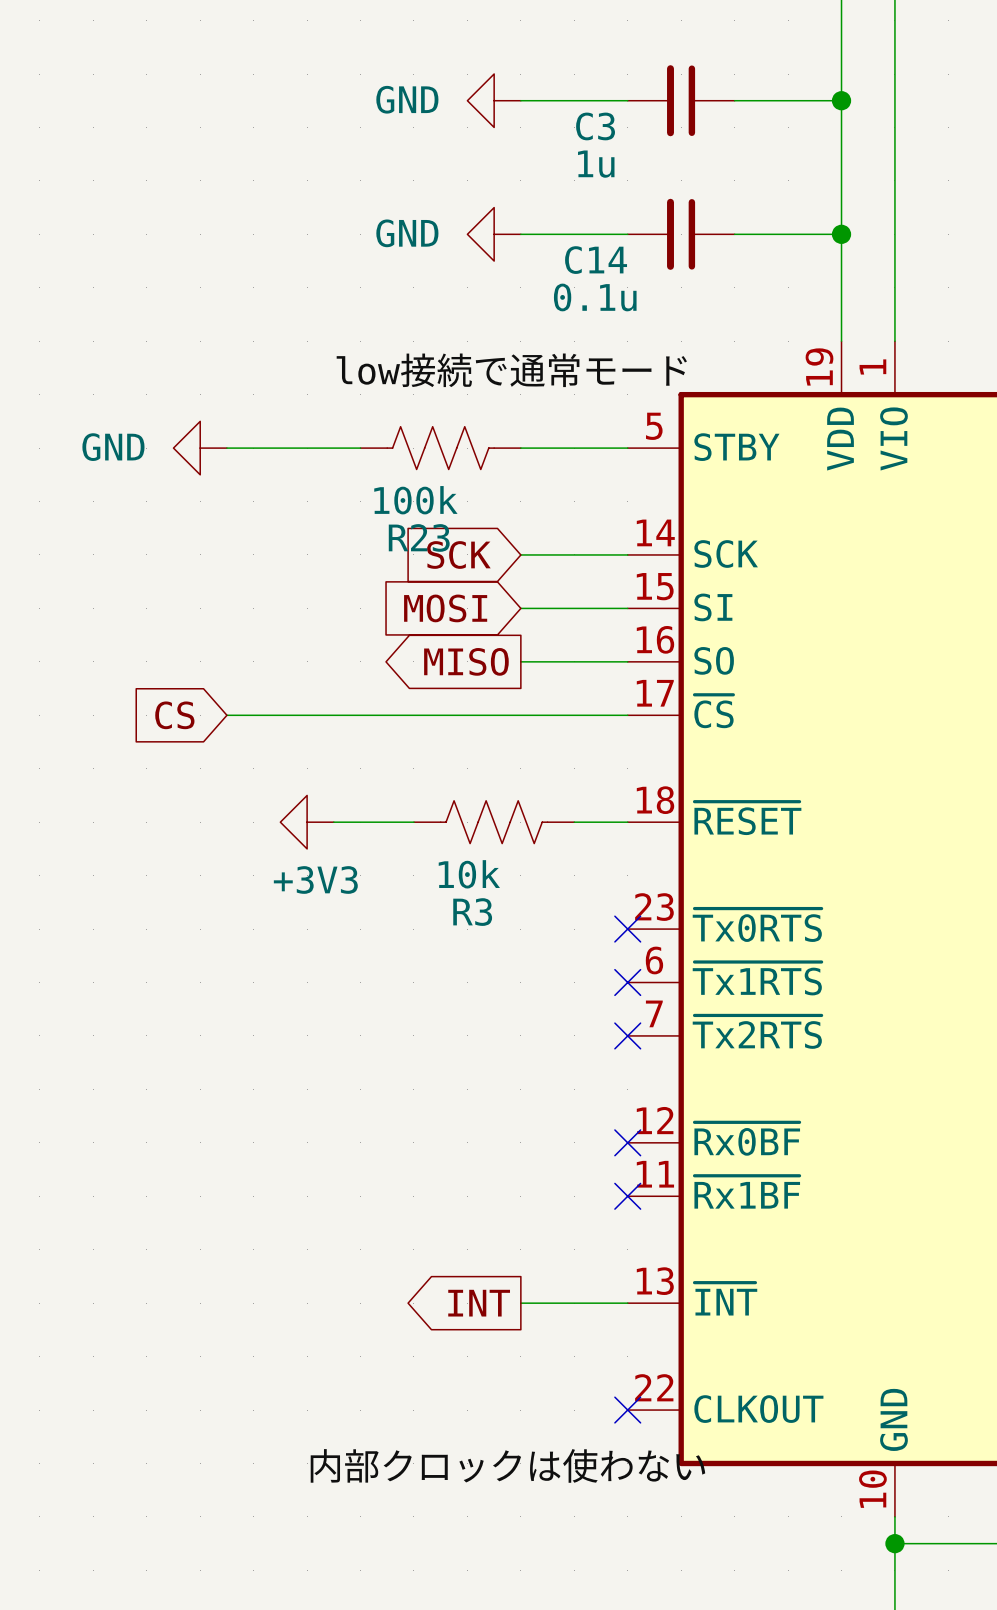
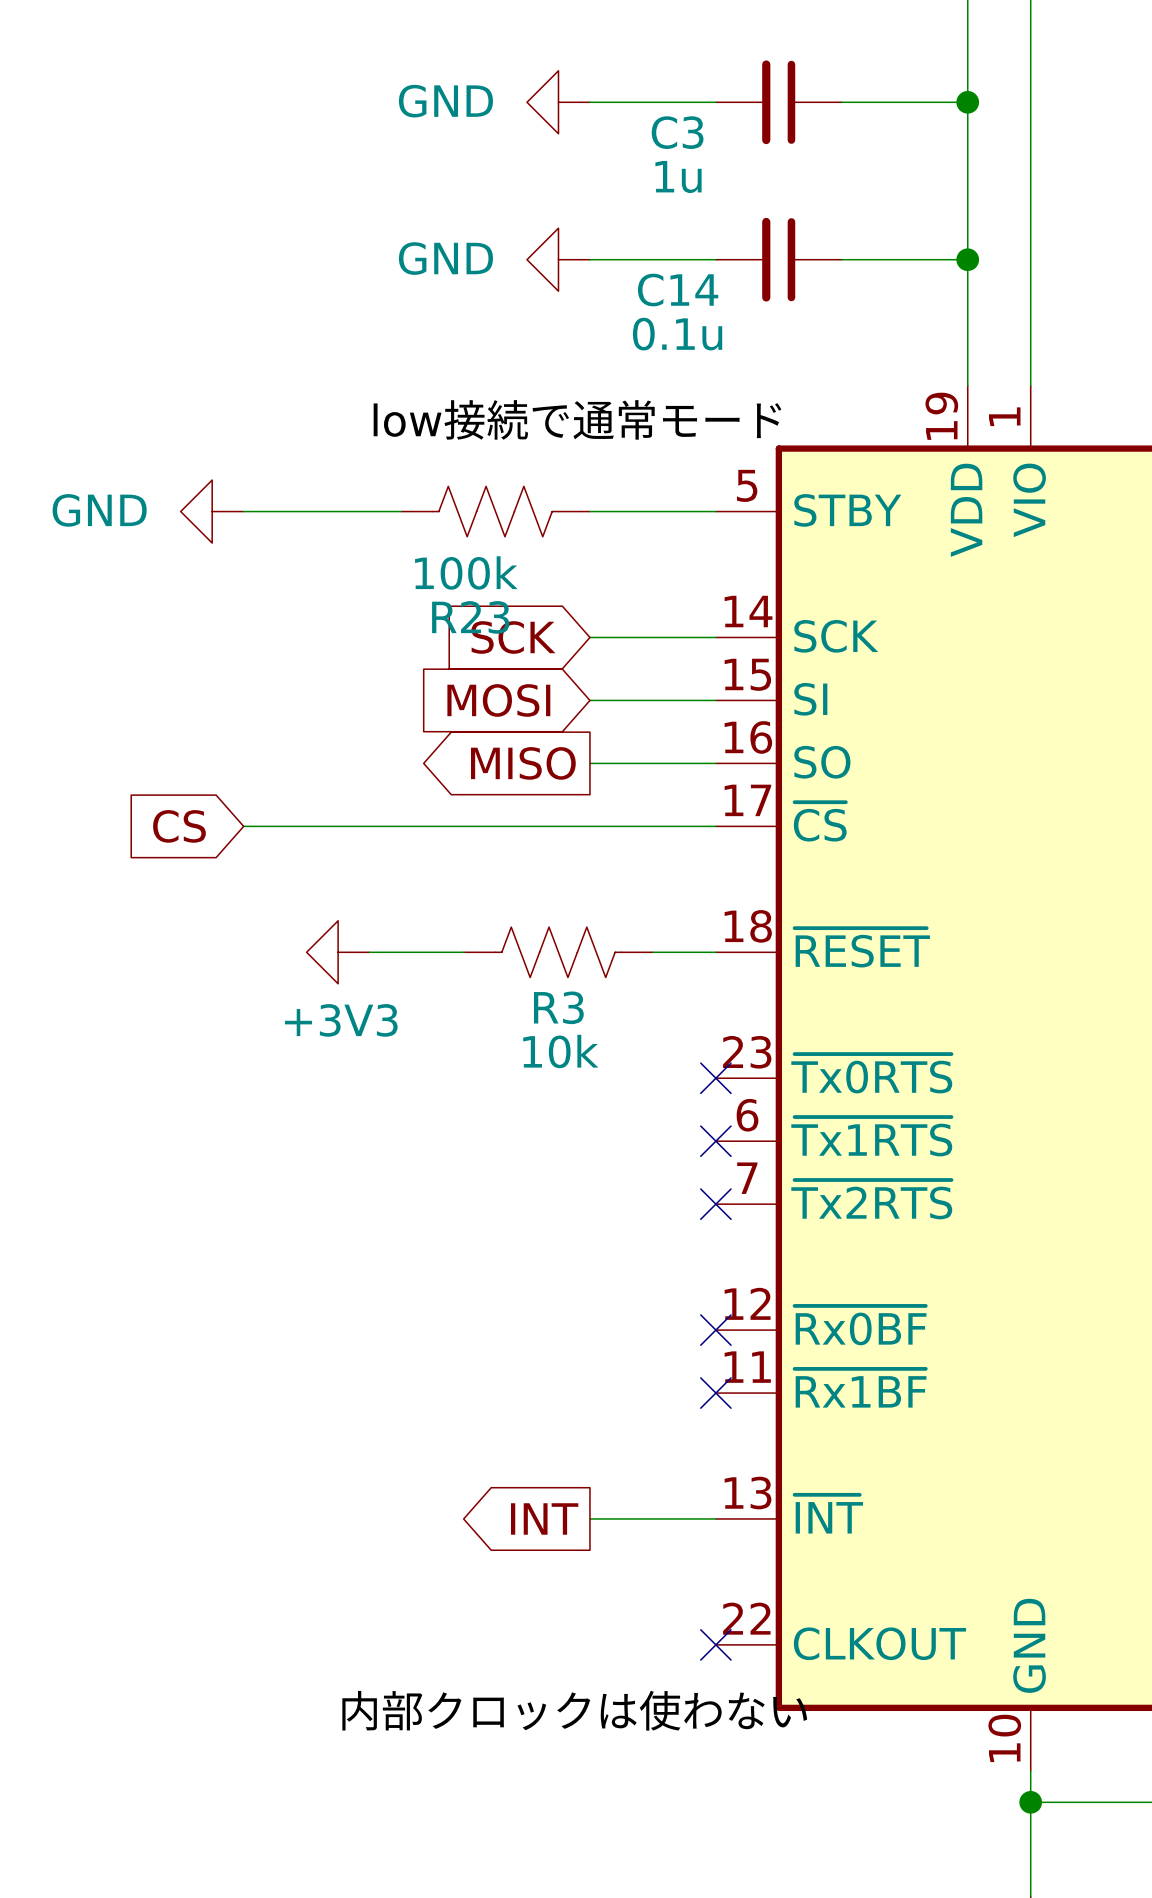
R3 value position: 10k (469, 874) -> 10k (560, 1051)
R3 name position: R3 (472, 912) -> R3 (558, 1007)

